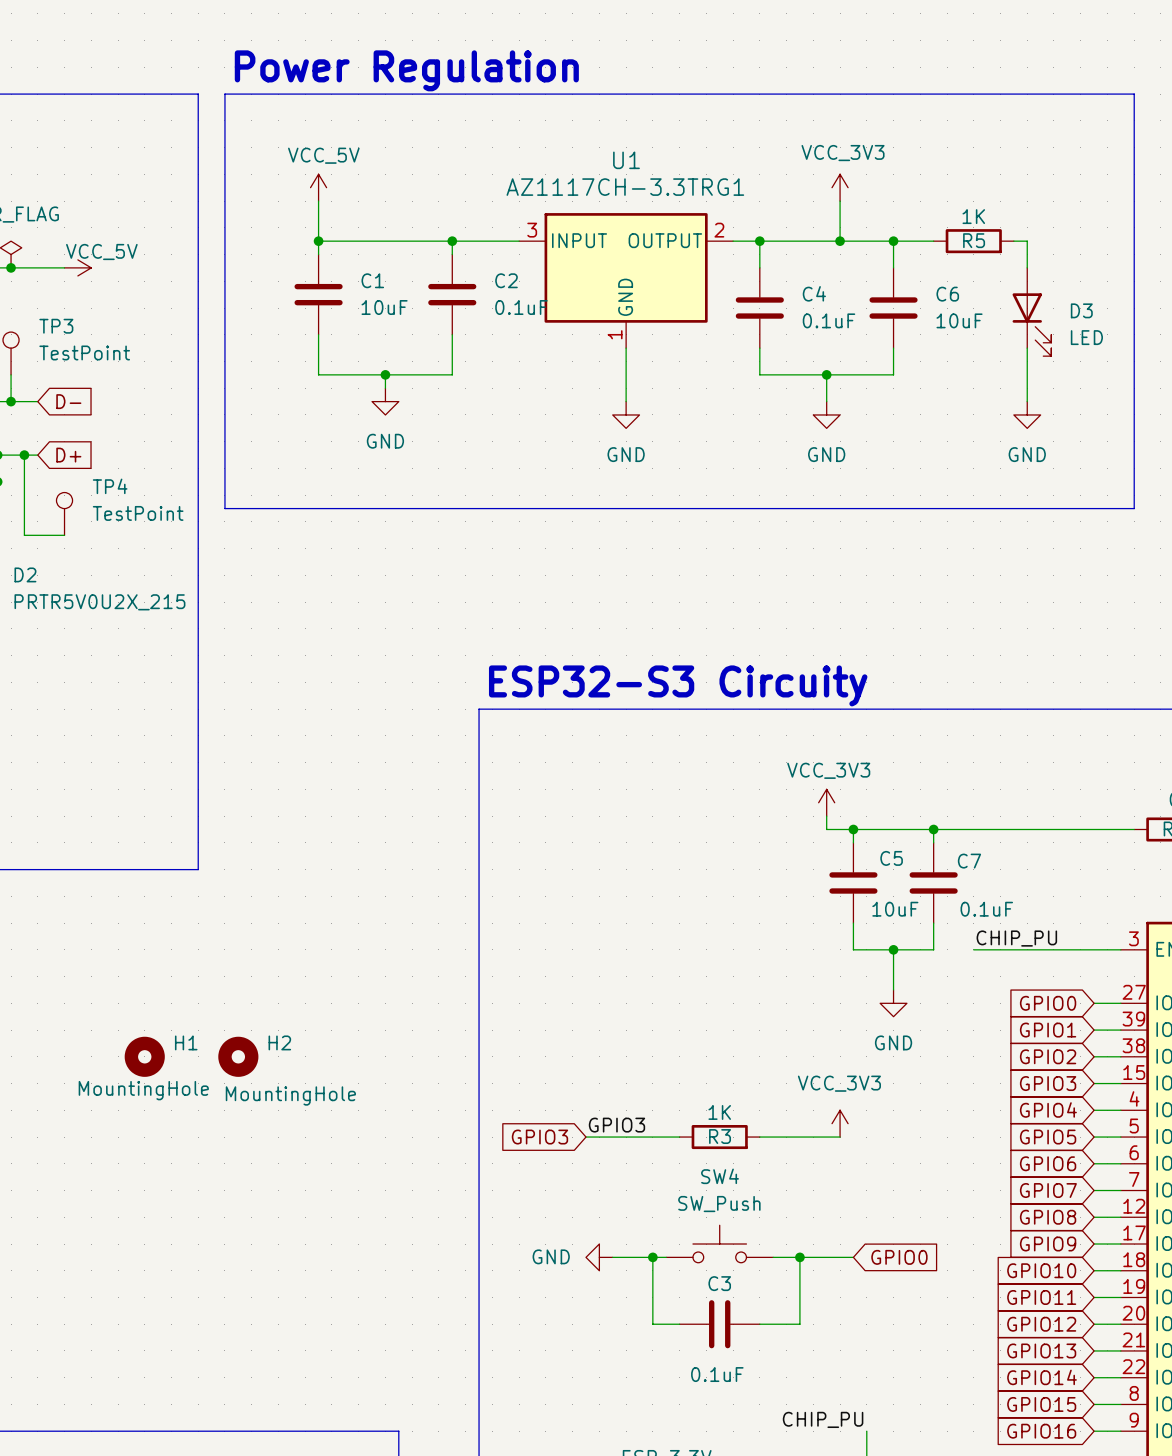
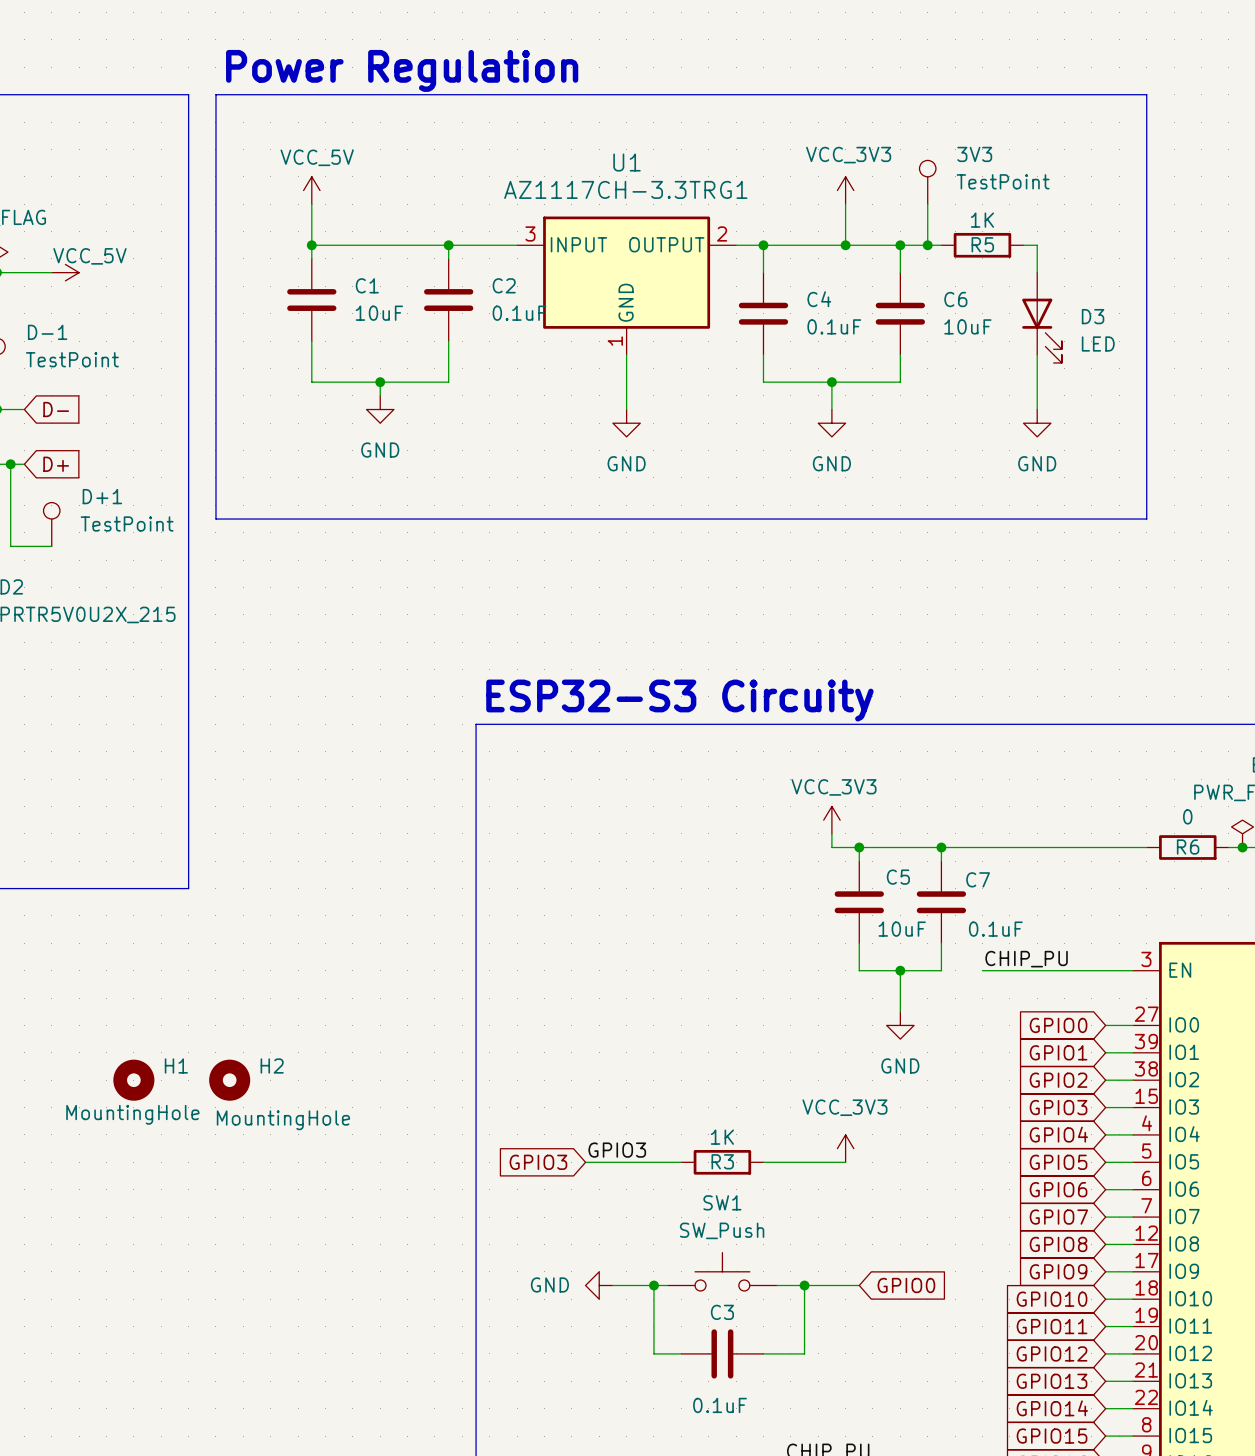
3V3: none -> TestPoint (927, 182)
wire: none -> (927, 204) (927, 245)
junction: none -> (927, 245)
TP3 name: TP3 (56, 326) -> D-1 (47, 332)
TP4 name: TP4 (110, 486) -> D+1 (102, 496)
SW4 name: SW4 (720, 1176) -> SW1 (722, 1202)

